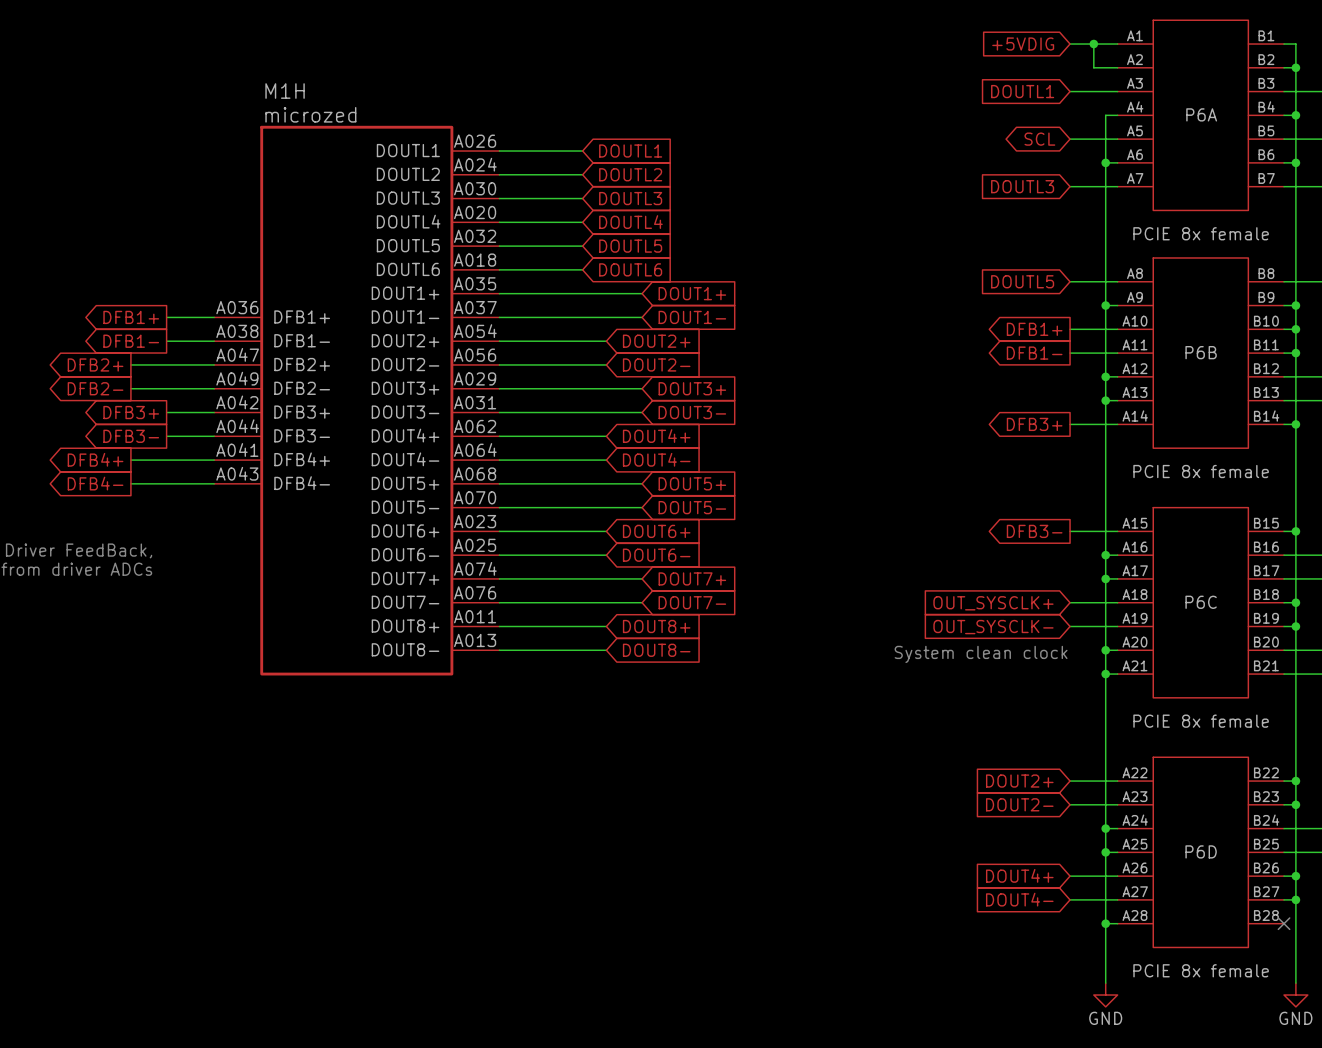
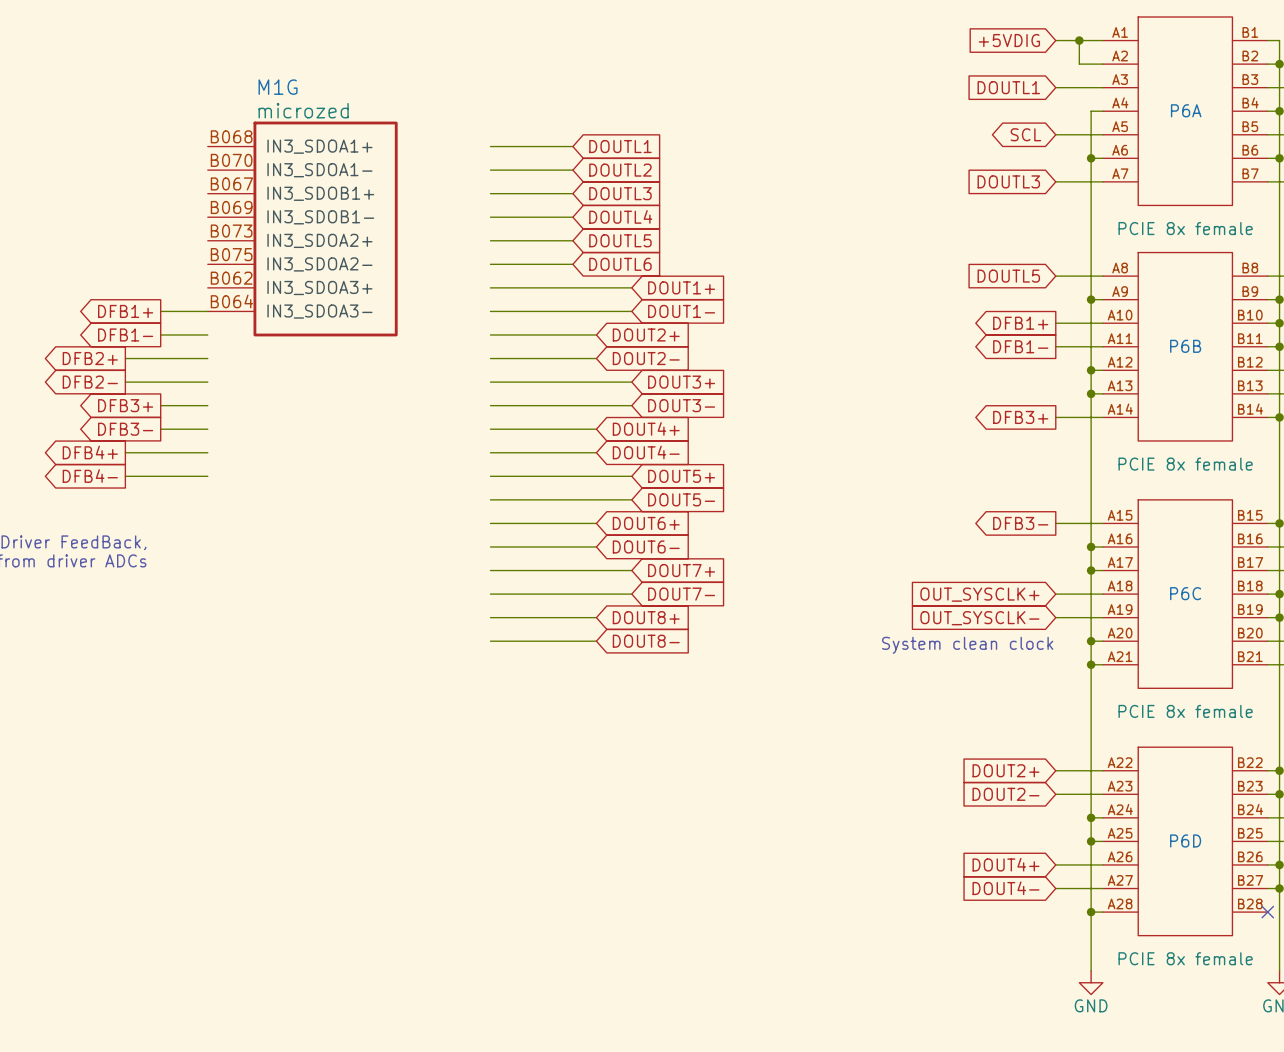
M1G: none -> microzed (302, 228)
M1H: microzed (356, 400) -> none

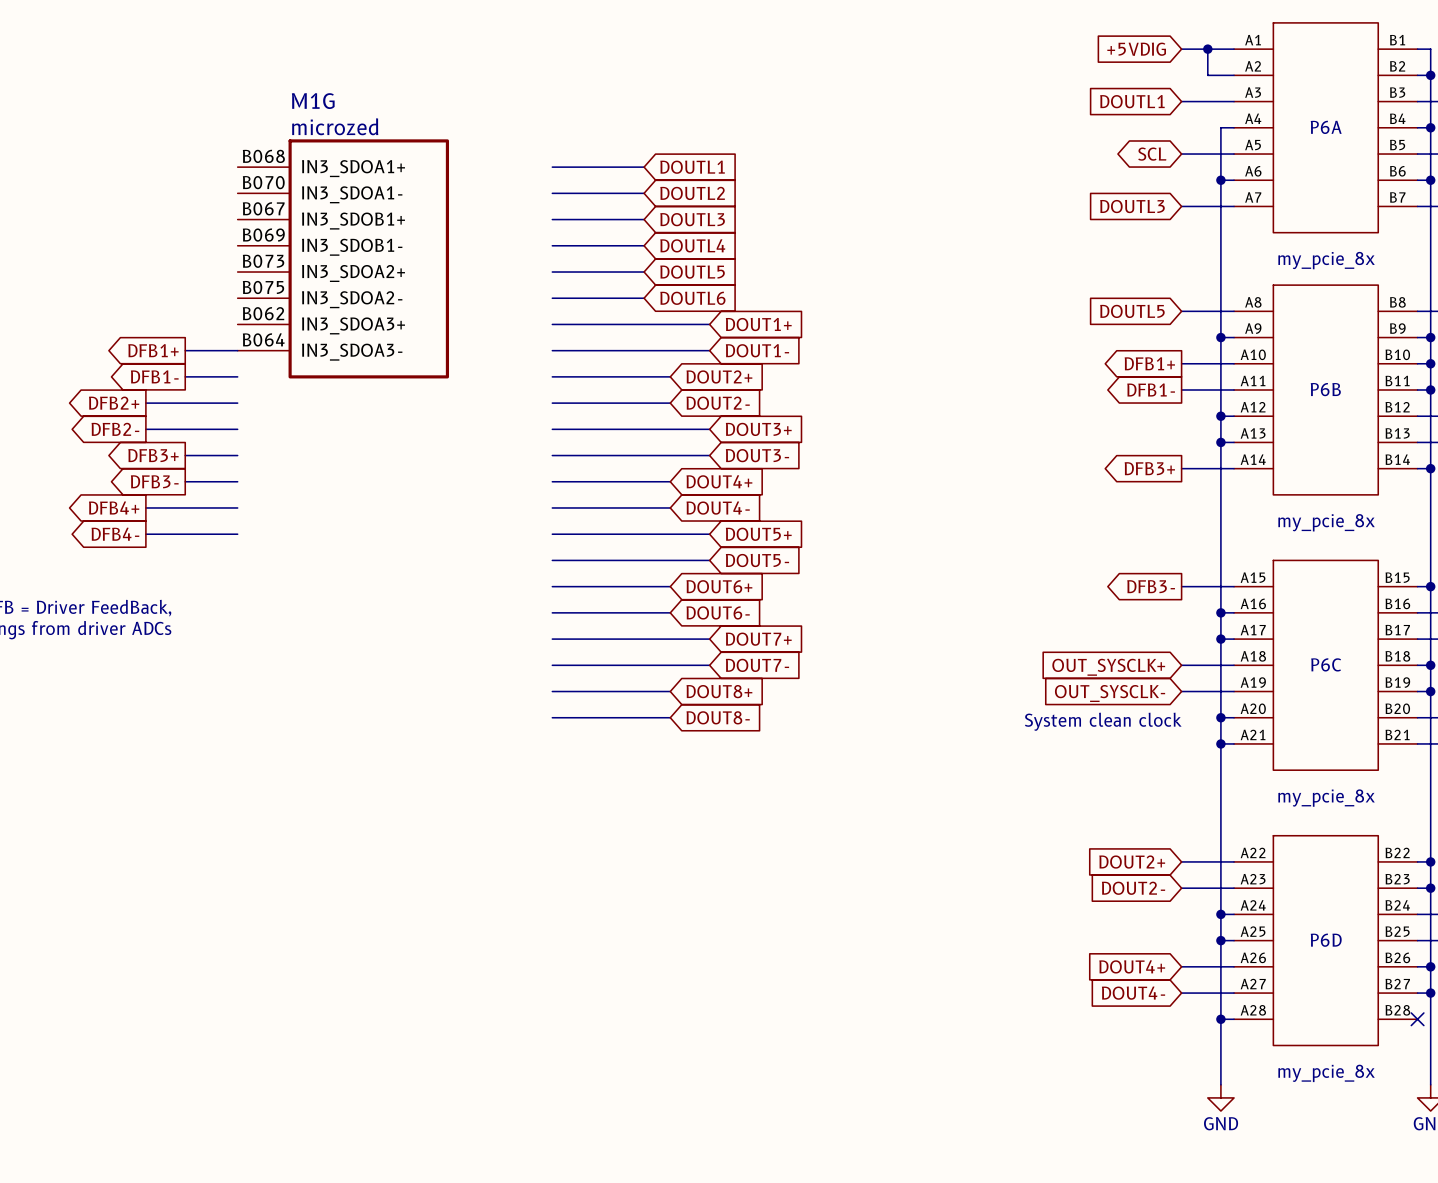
P6A value: PCIE 8x female (1185, 228) -> my_pcie_8x (1326, 260)
P6B value: PCIE 8x female (1185, 464) -> my_pcie_8x (1326, 522)
P6C value: PCIE 8x female (1185, 711) -> my_pcie_8x (1326, 798)
P6D value: PCIE 8x female (1185, 958) -> my_pcie_8x (1326, 1073)

